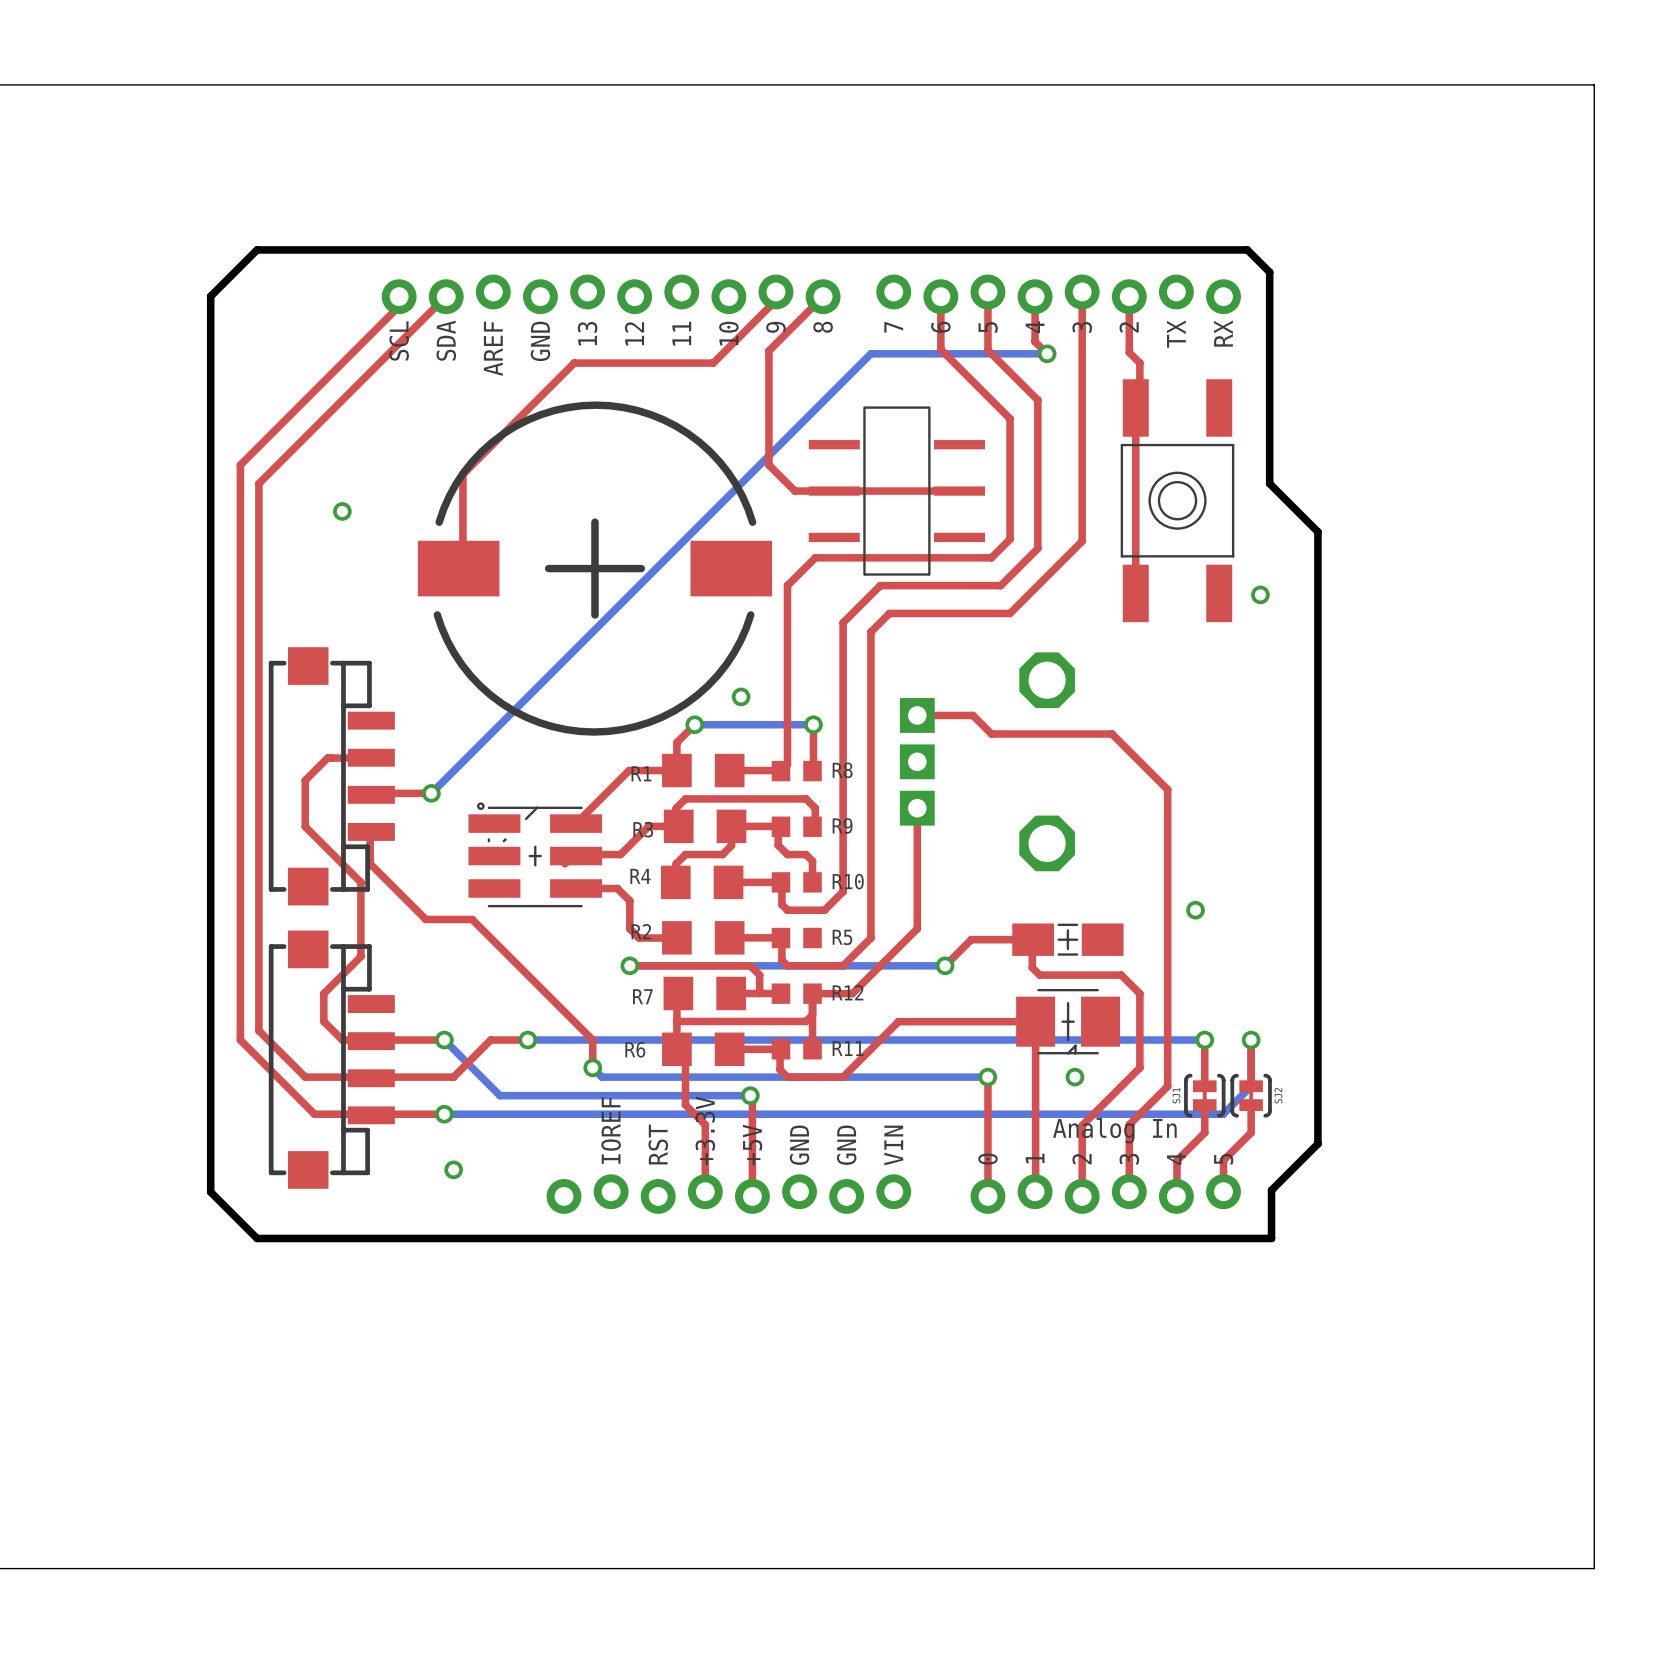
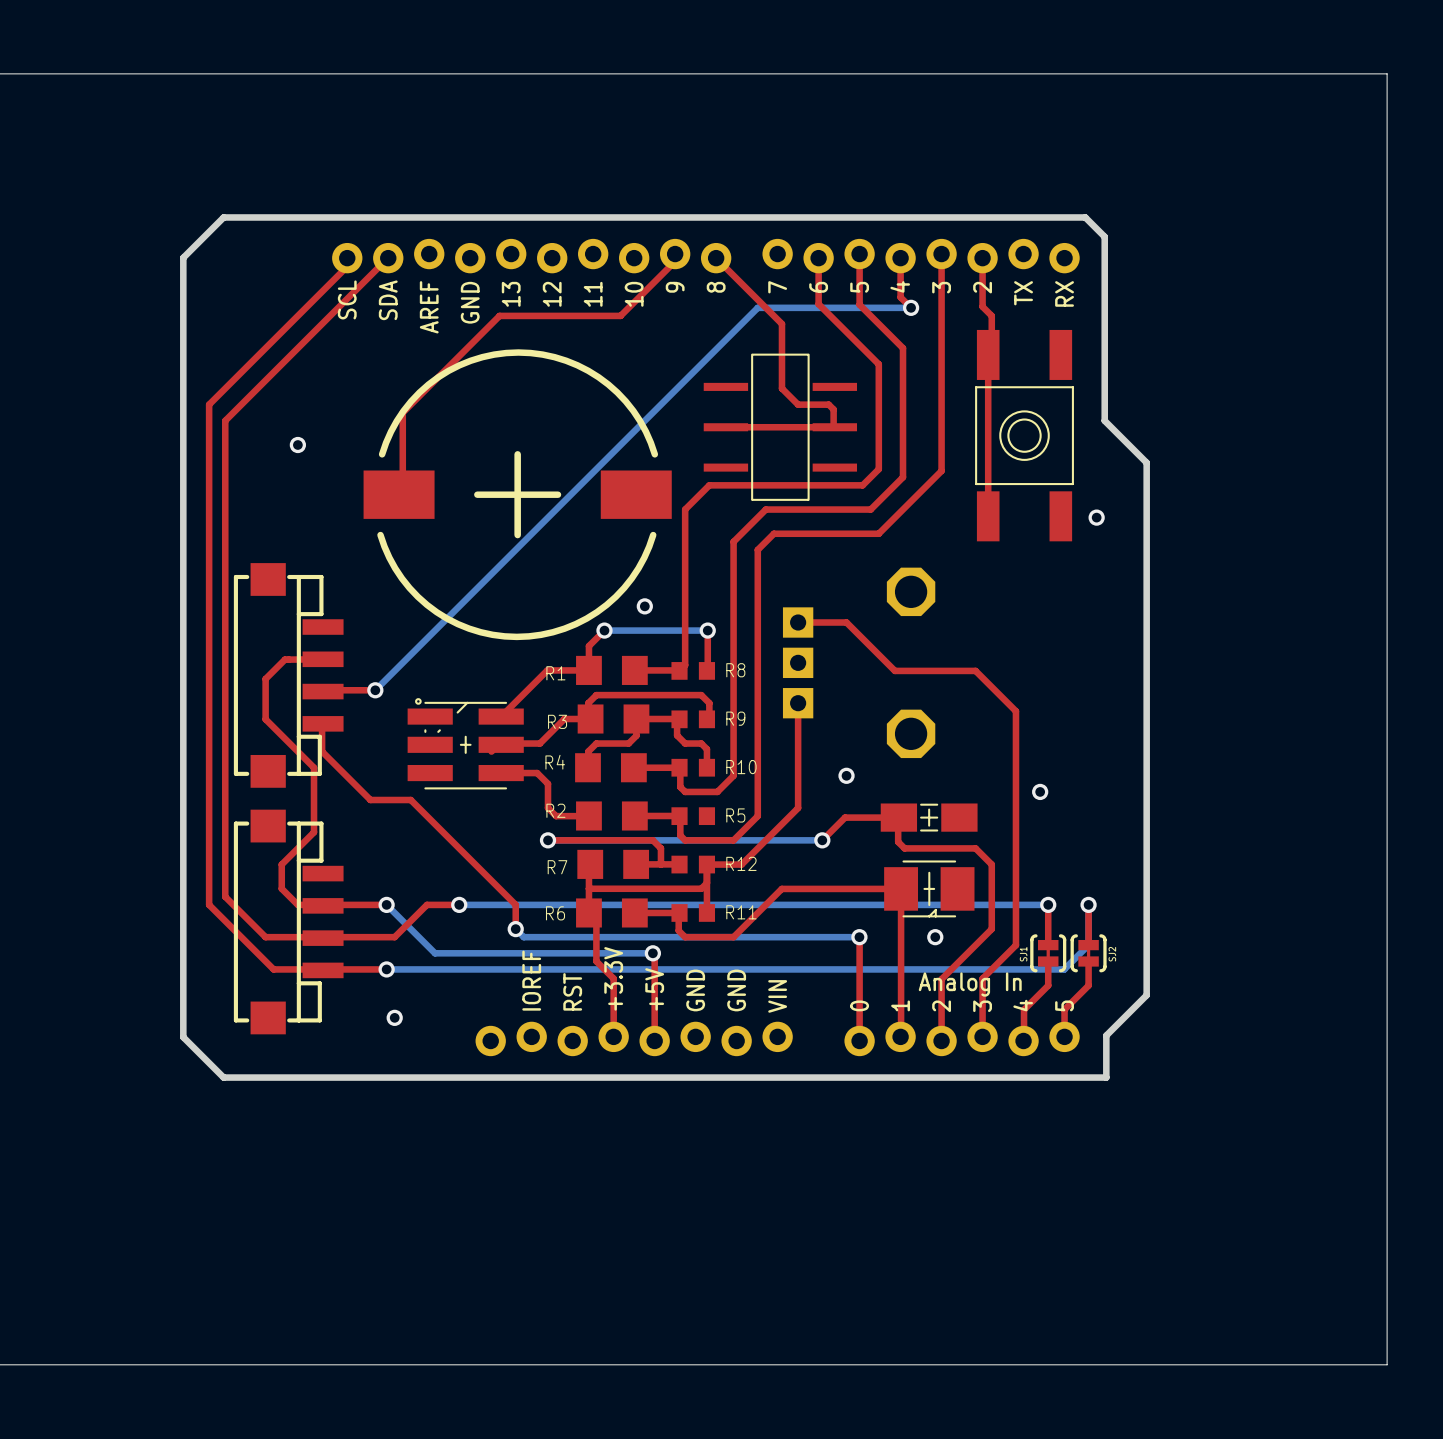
top track: (823, 296) (768, 350) (768, 465) (794, 491) (834, 491) -> (716, 258) (781, 323) (781, 388) (798, 404) (828, 404) (833, 409) (834, 427)
top track: (991, 734) (1112, 734) (1167, 789) (1167, 817) -> (862, 638) (894, 670) (975, 670) (1015, 711)
via: none -> (846, 775)

